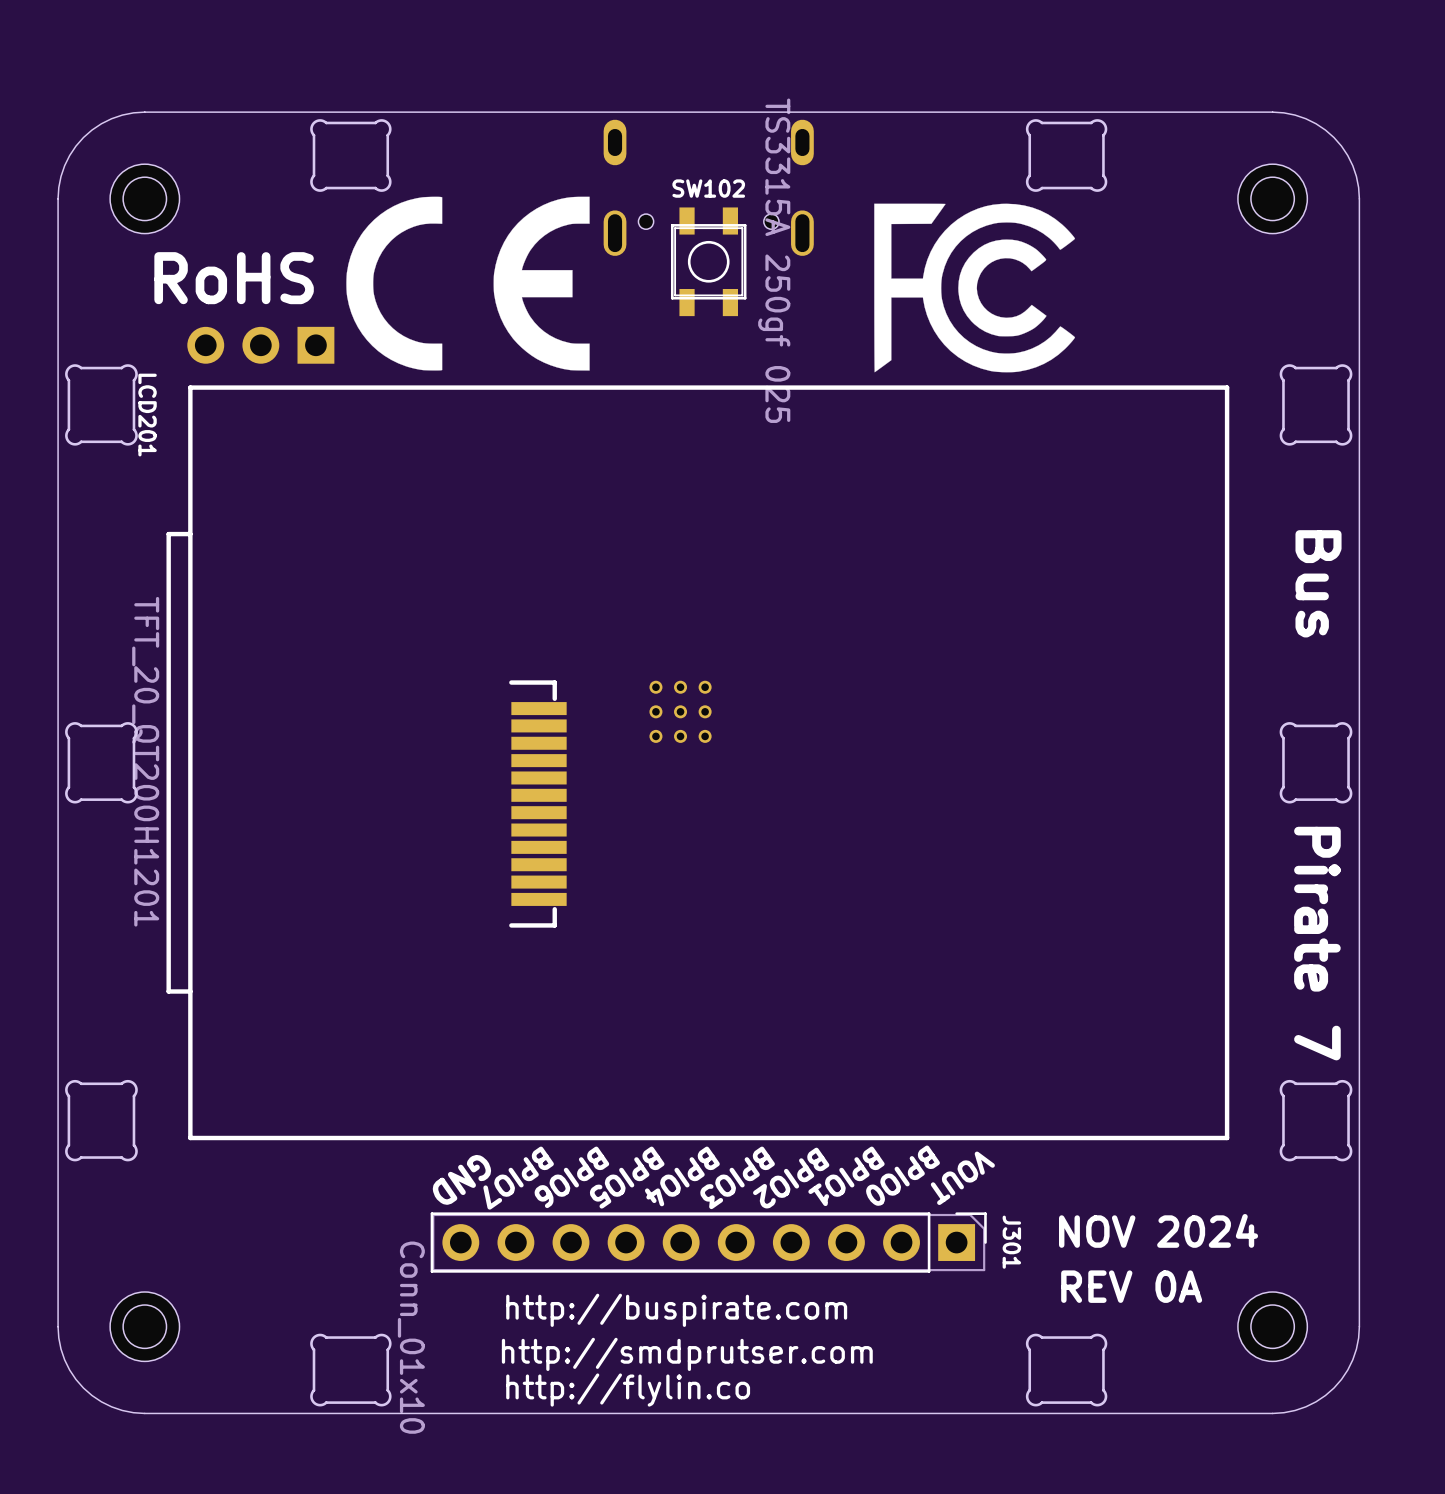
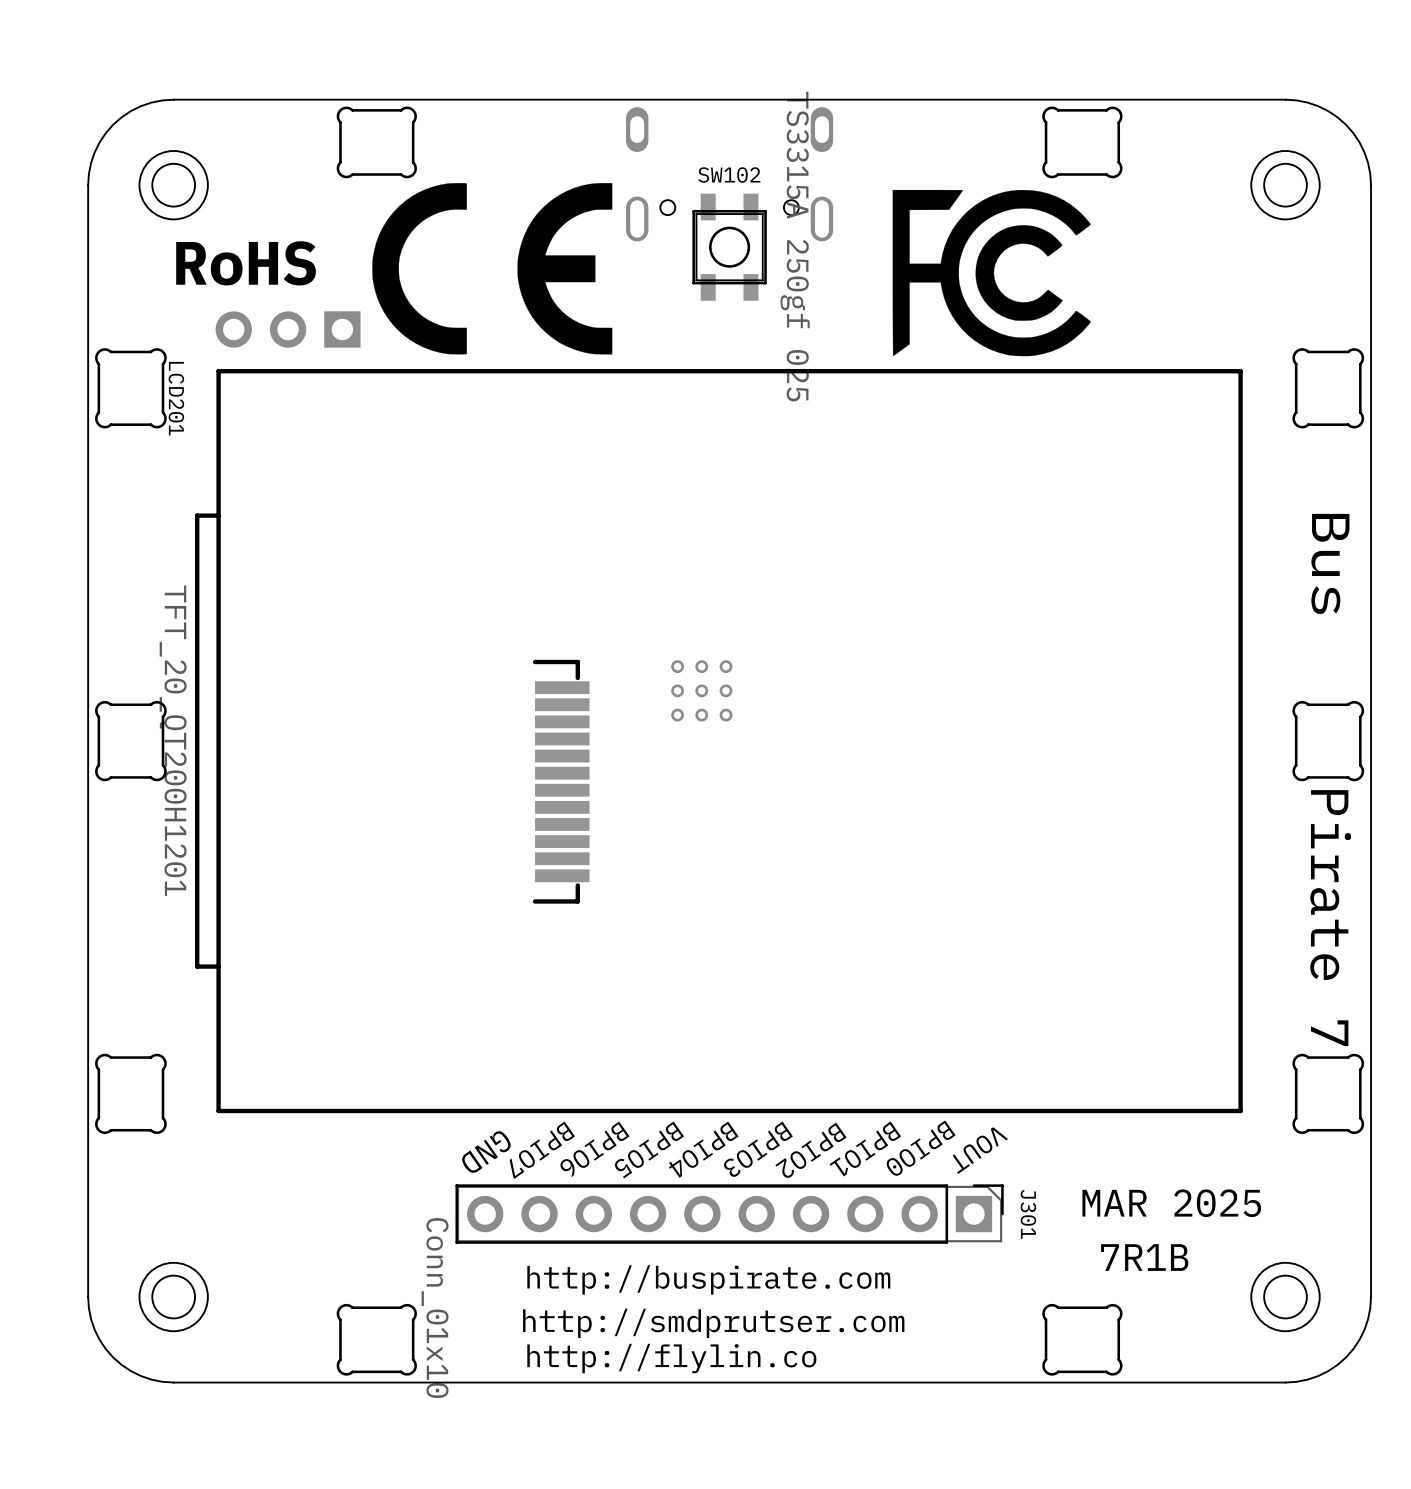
text: NOV 2024 (1158, 1230) -> MAR 2025 (1171, 1203)
text: REV 0A (1131, 1286) -> 7R1B (1144, 1257)

